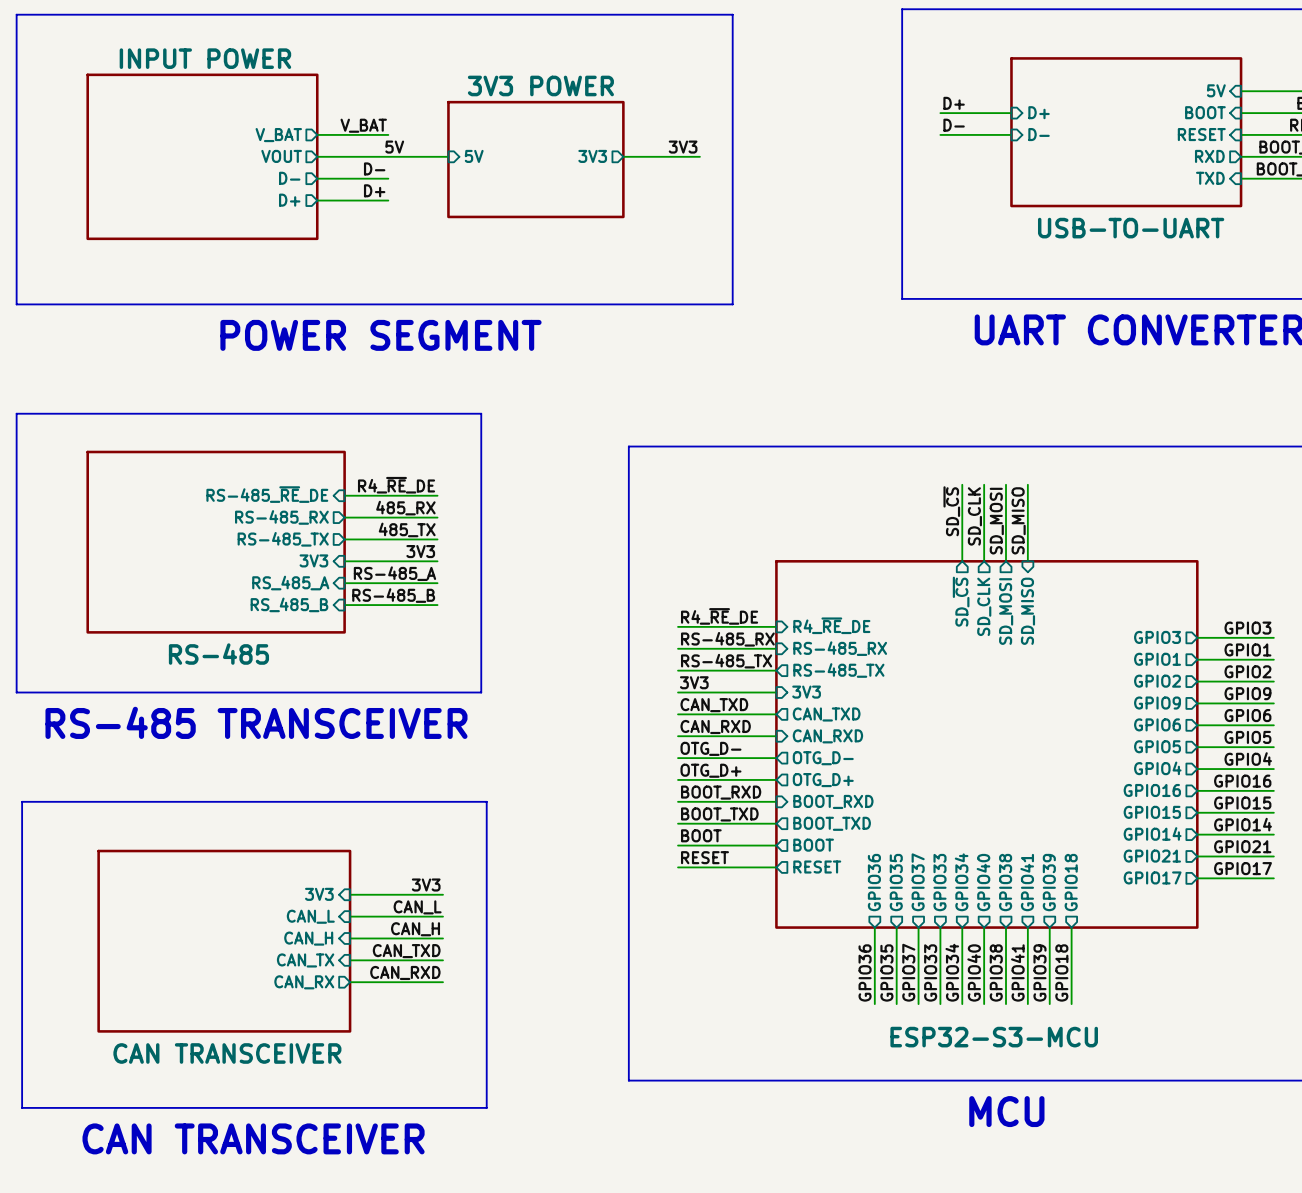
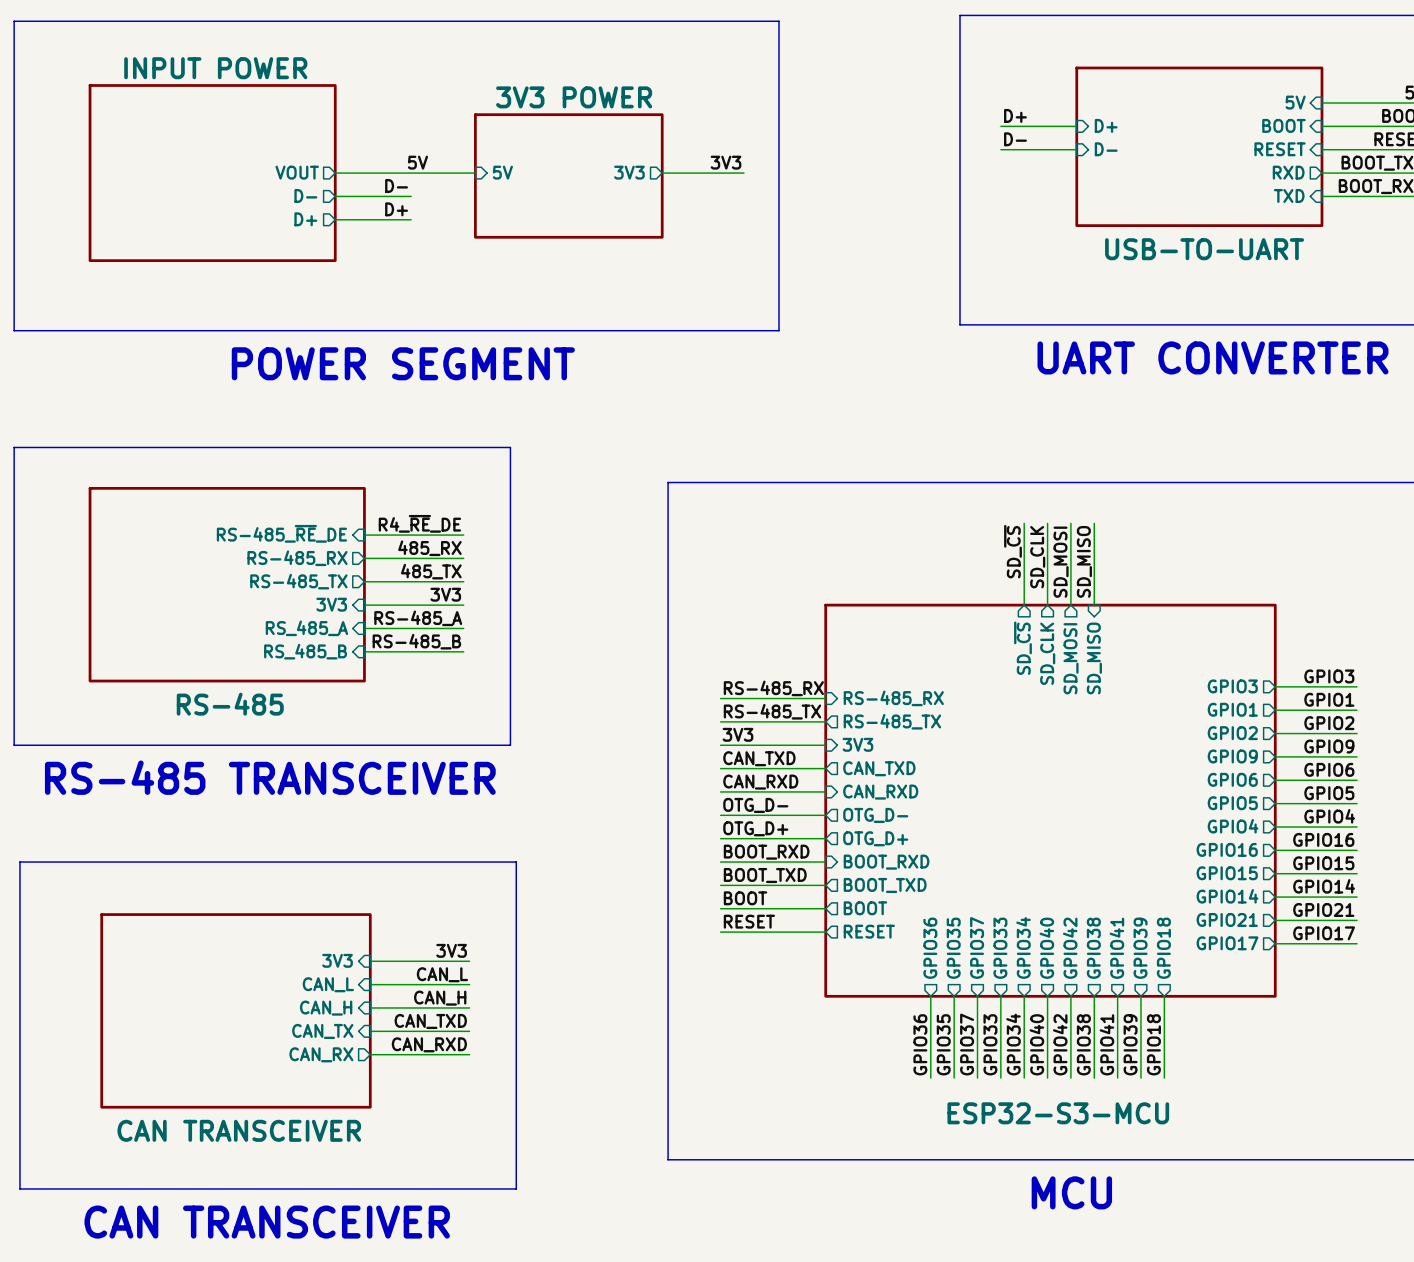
label: V_BAT (363, 125) -> none
wire: (317, 134) (388, 134) -> none
sheet pin: V_BAT (278, 135) -> none
label: R4_~{RE}_DE (719, 616) -> none
sheet pin: R4_~{RE}_DE (831, 625) -> none
wire: (678, 626) (776, 626) -> none
sheet pin: GPIO38 (1005, 882) -> GPIO42 (1070, 948)
sheet pin: GPIO41 (1027, 882) -> GPIO38 (1093, 948)
sheet pin: GPIO39 (1049, 882) -> GPIO41 (1116, 948)
sheet pin: GPIO18 (1071, 882) -> GPIO39 (1140, 948)
sheet pin: none -> GPIO18 (1163, 948)
wire: none -> (1164, 996) (1164, 1078)
label: GPIO38 (996, 972) -> GPIO42 (1060, 1044)
label: GPIO41 (1017, 972) -> GPIO38 (1083, 1044)
label: GPIO39 (1039, 972) -> GPIO41 (1106, 1044)
label: GPIO18 (1061, 972) -> GPIO39 (1130, 1044)
label: none -> GPIO18 (1153, 1044)

